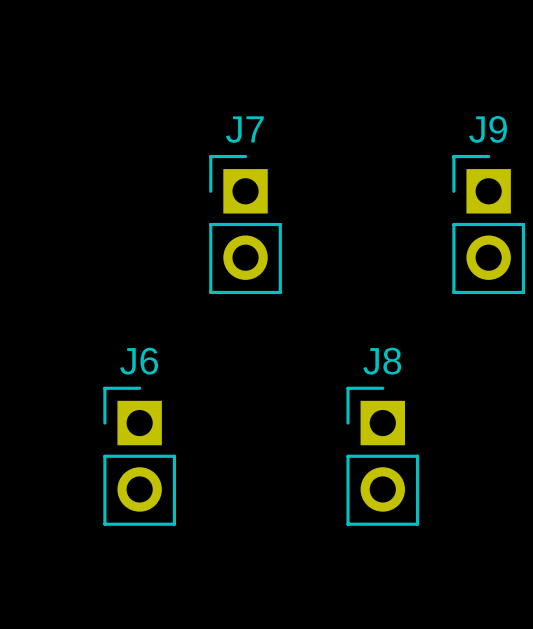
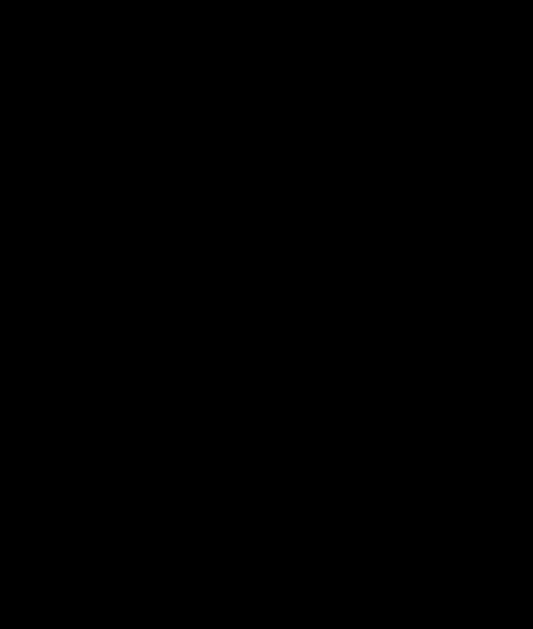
J7: (245, 224) -> none
J9: (488, 224) -> none
J6: (139, 456) -> none
J8: (382, 456) -> none

